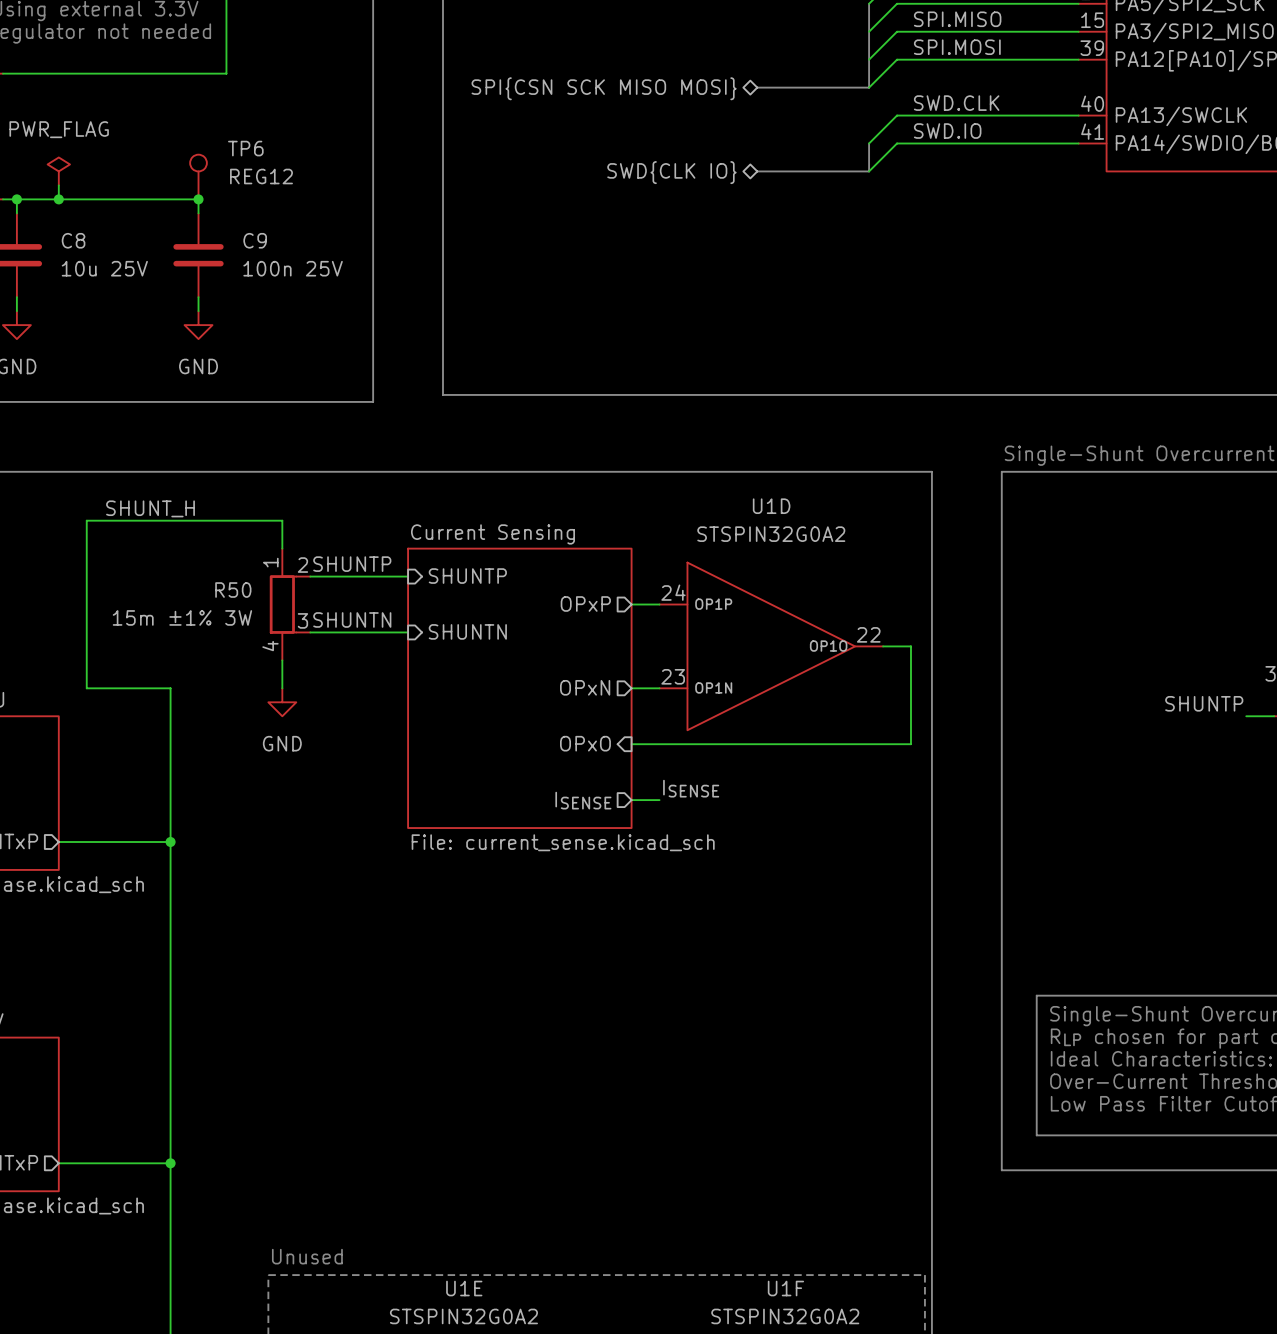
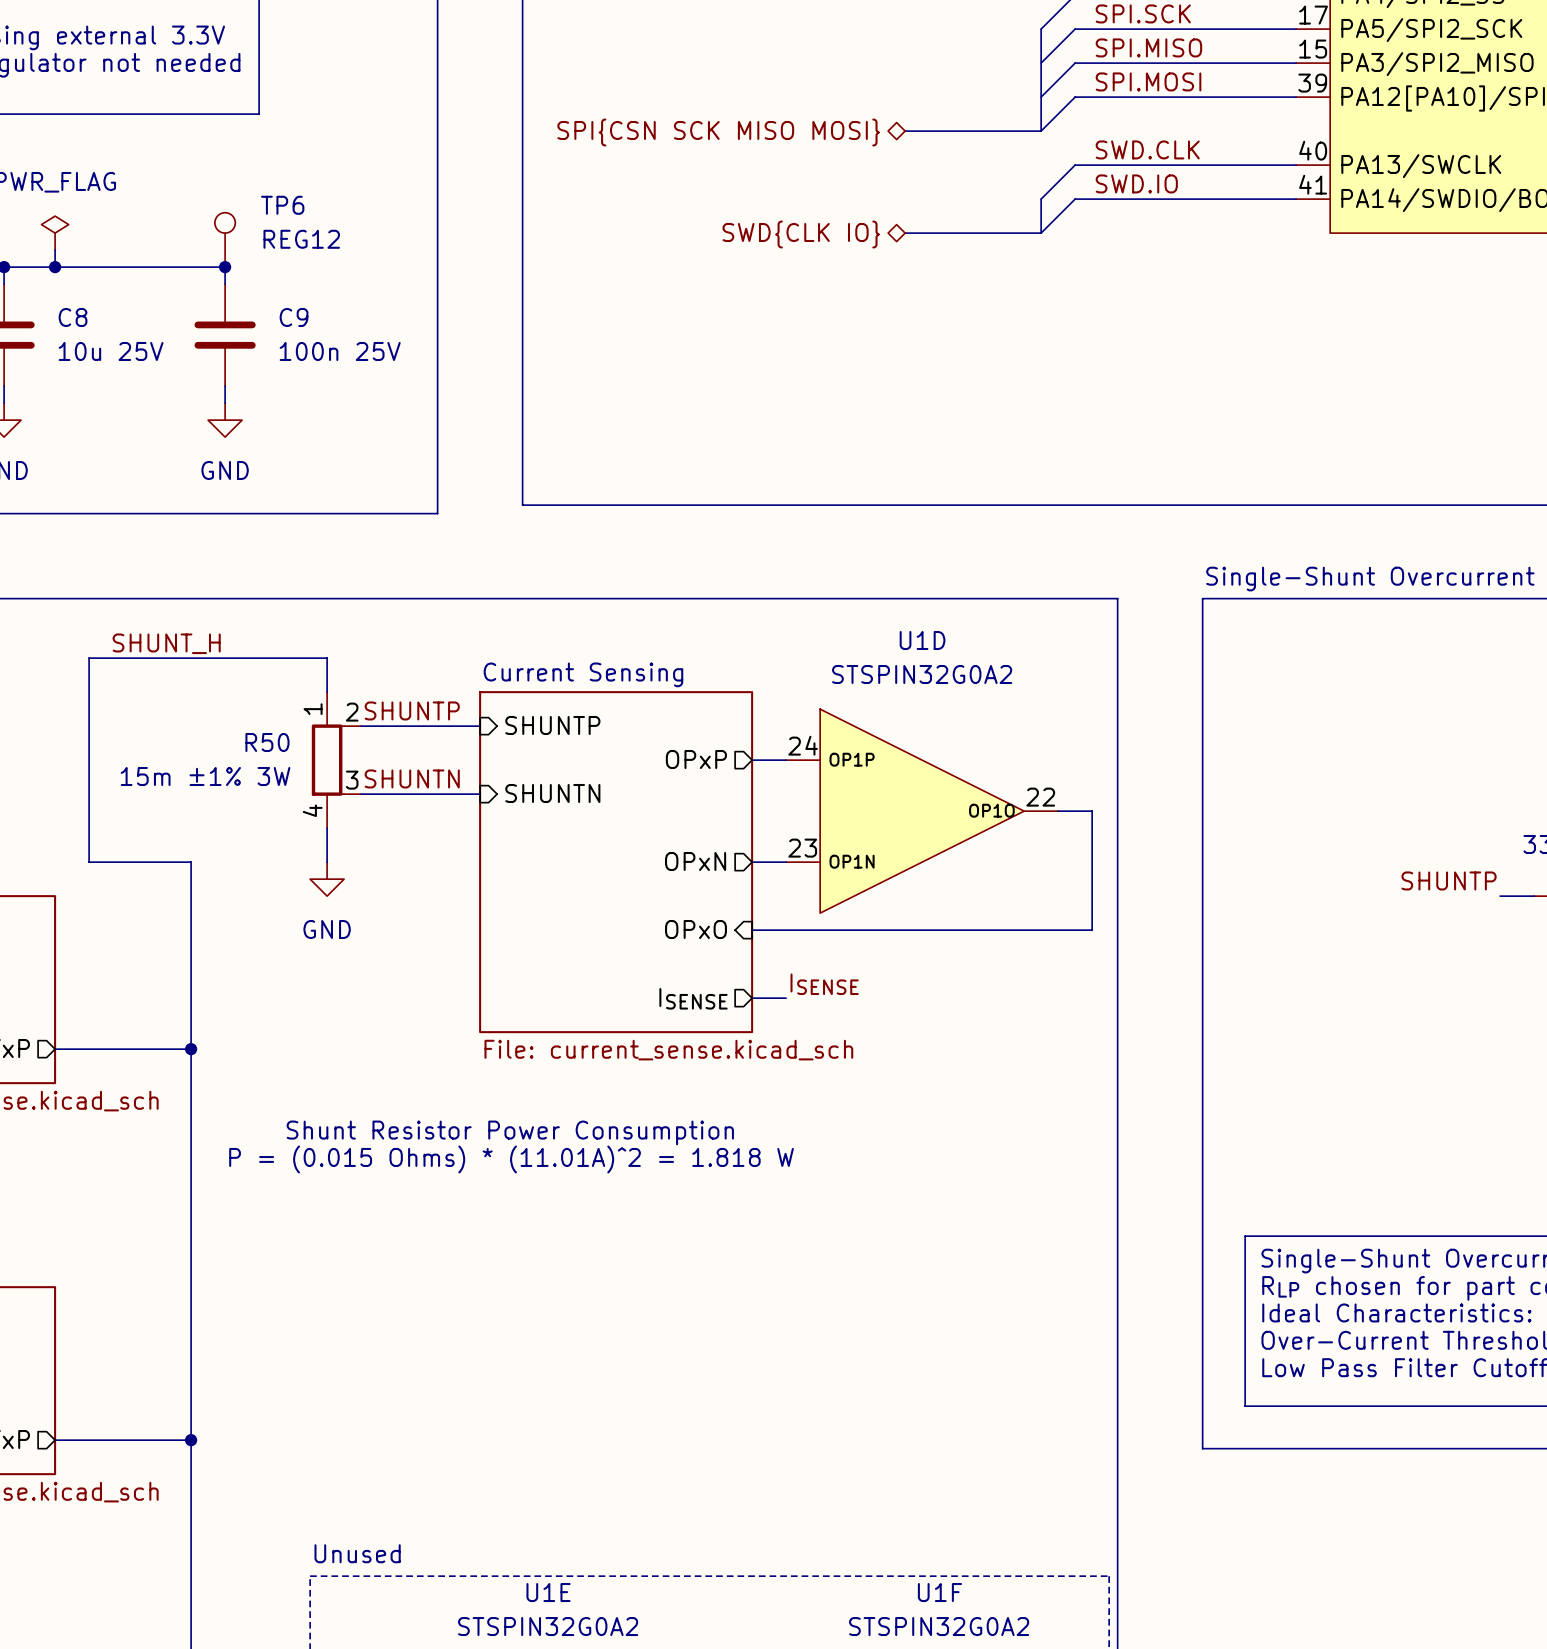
text: none -> Shunt Resistor Power Consumption (510, 1132)
text: none -> P = (0.015 Ohms) * (11.01A)^2 = 1.818 W (511, 1159)

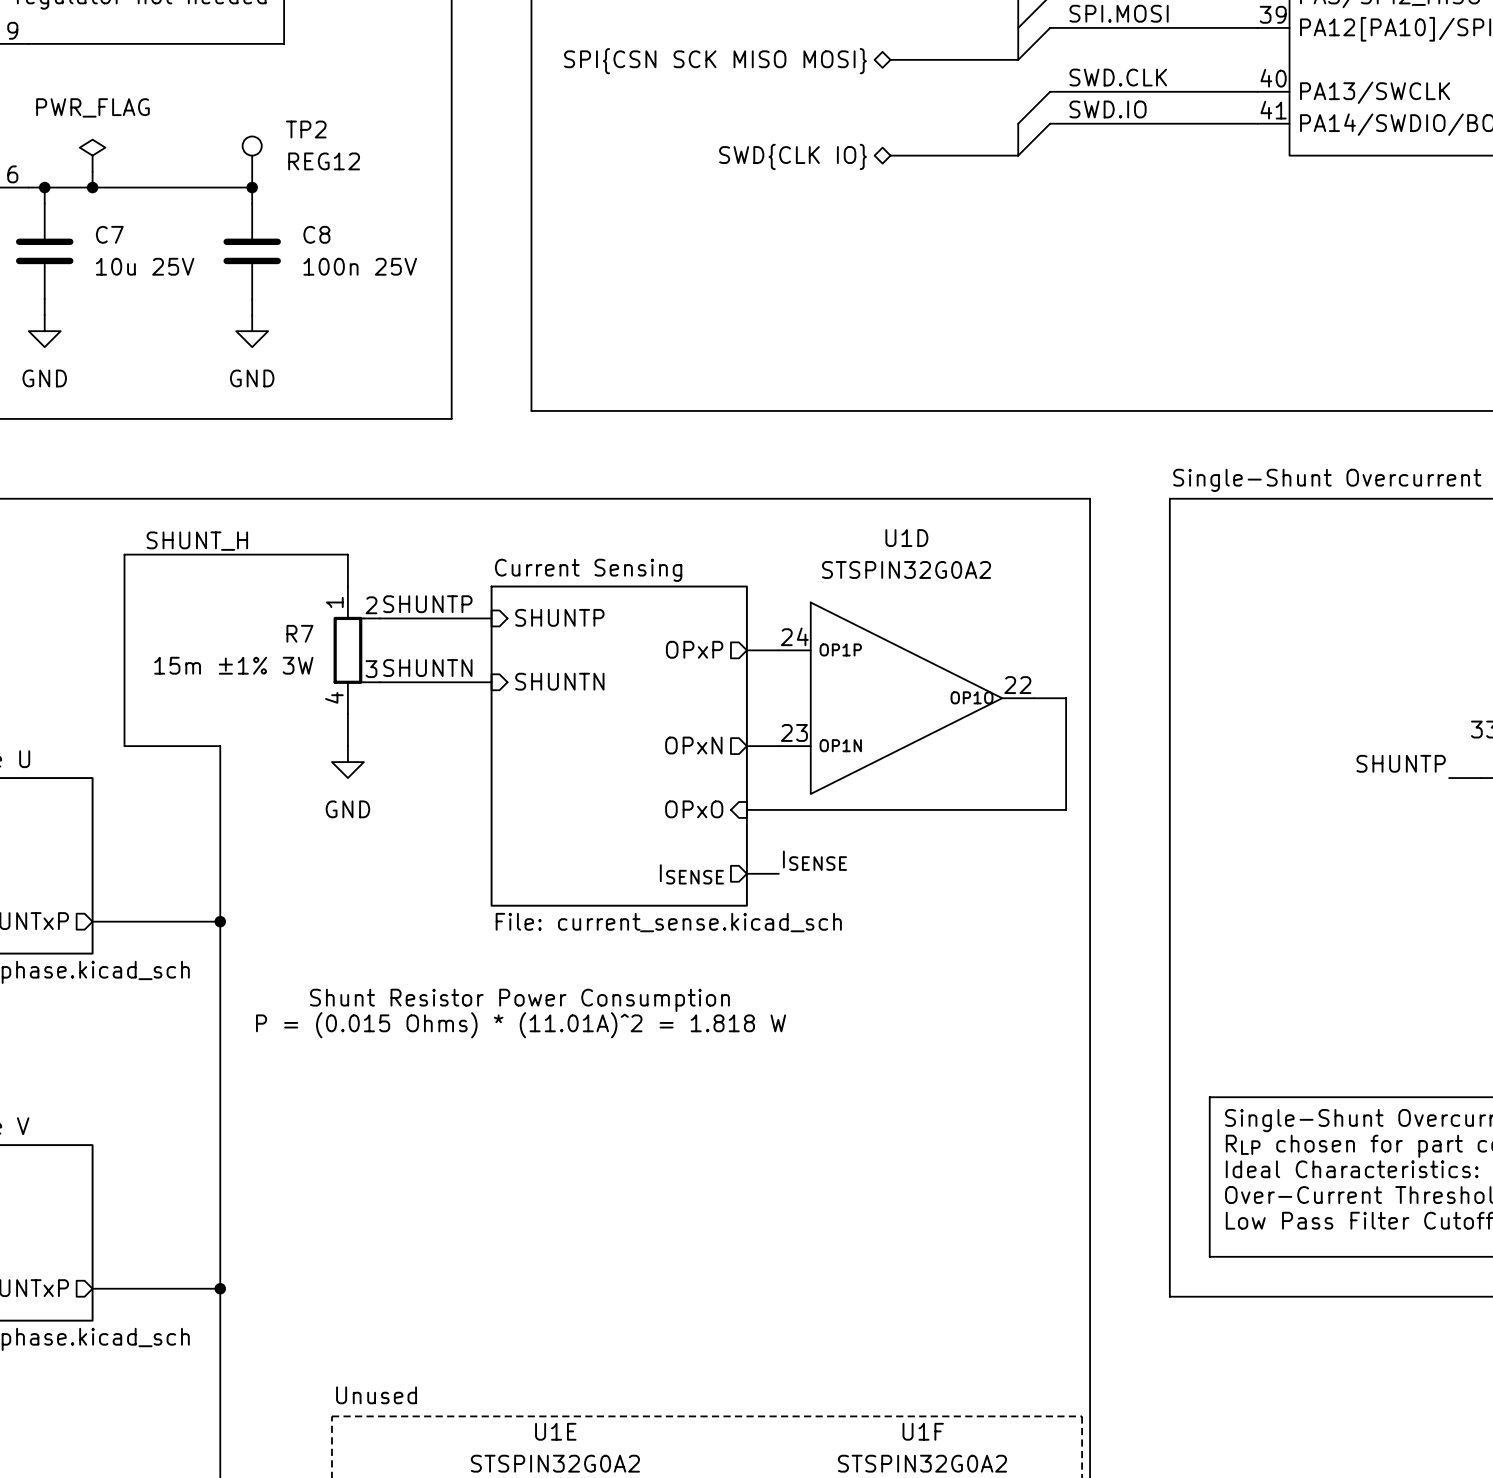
TP6 name: TP6 (282, 205) -> TP2 (306, 129)
C8 name: C8 (73, 317) -> C7 (109, 234)
C9 name: C9 (294, 317) -> C8 (316, 234)
R50 name: R50 (267, 742) -> R7 (299, 633)

